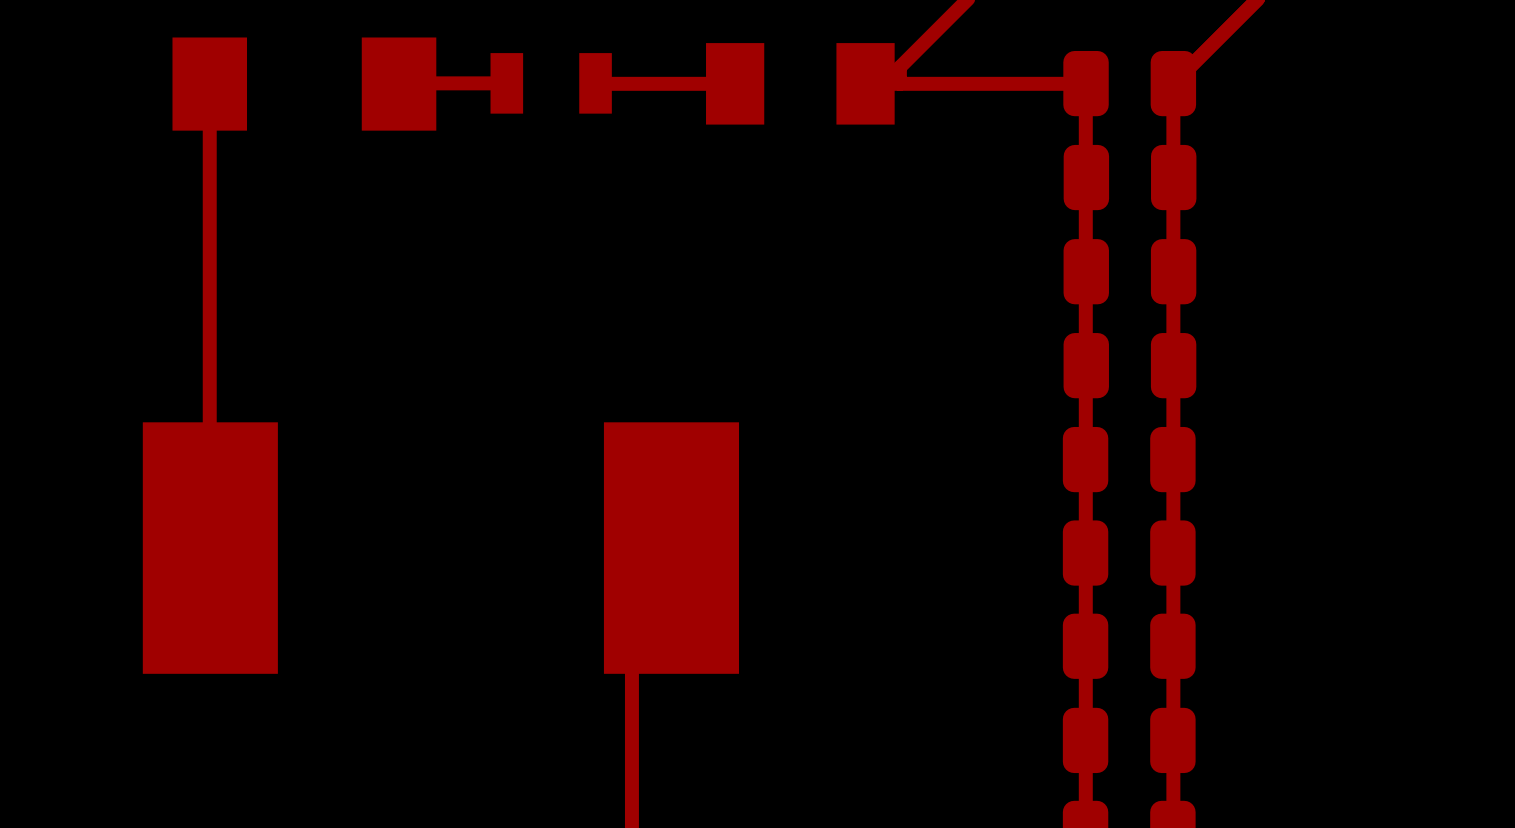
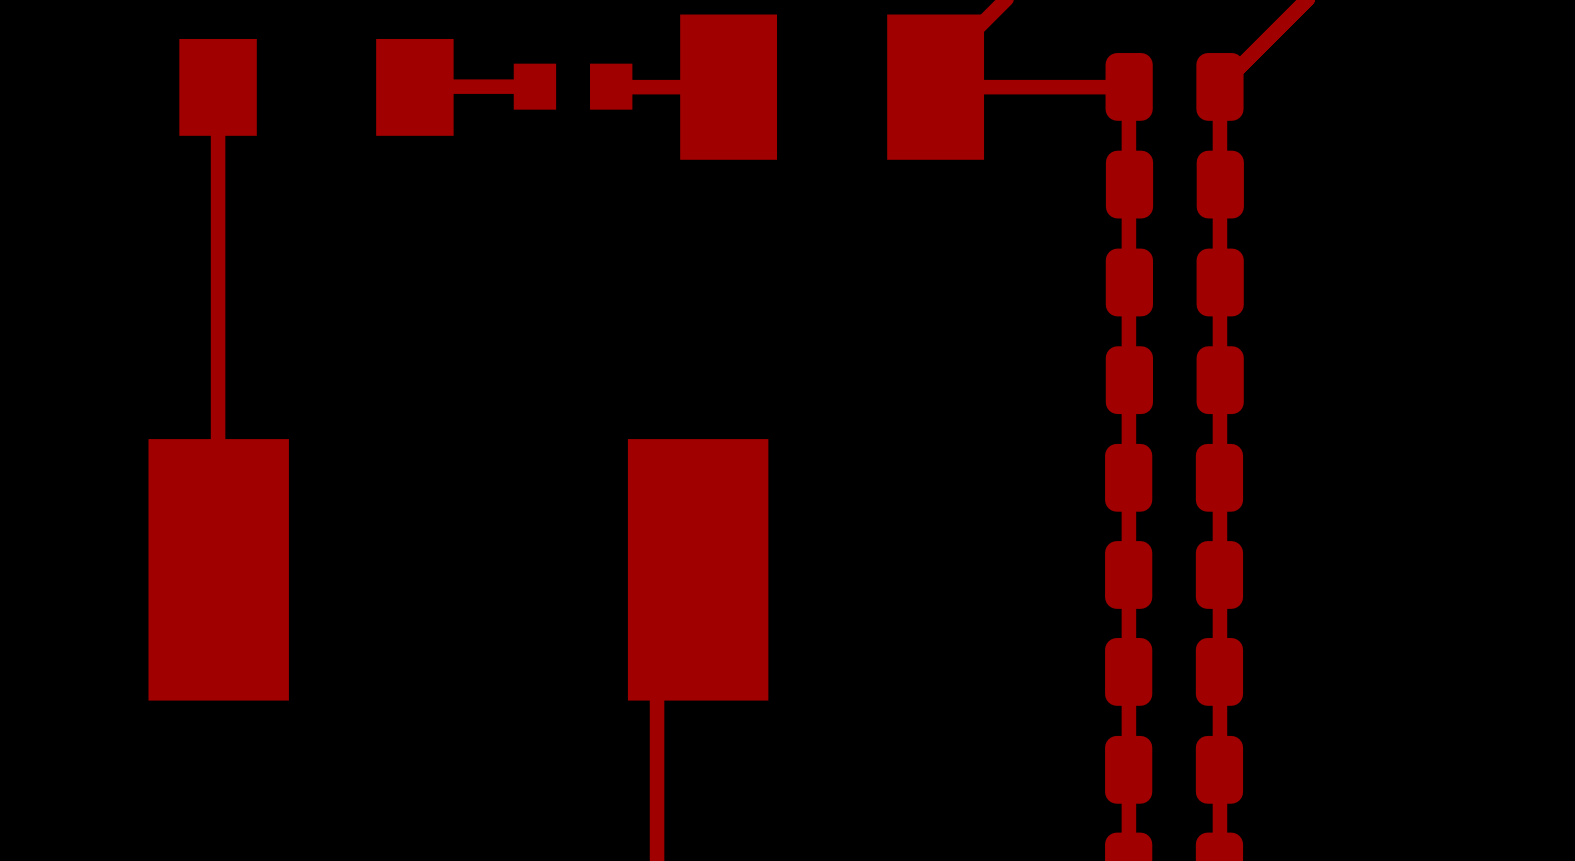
part footprint: [706, 43, 895, 125] -> [680, 14, 985, 160]
part footprint: [490, 53, 612, 114] -> [513, 63, 633, 110]

